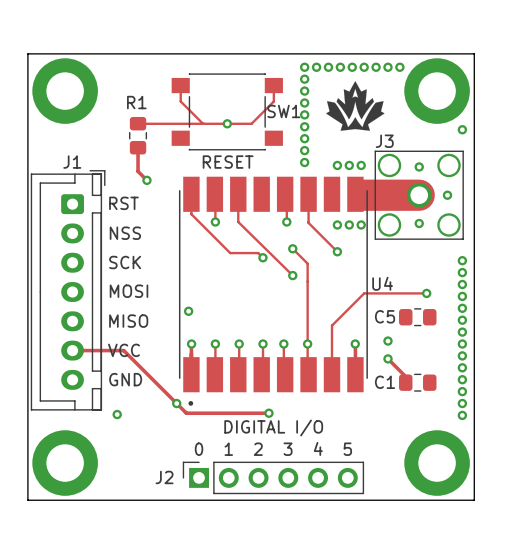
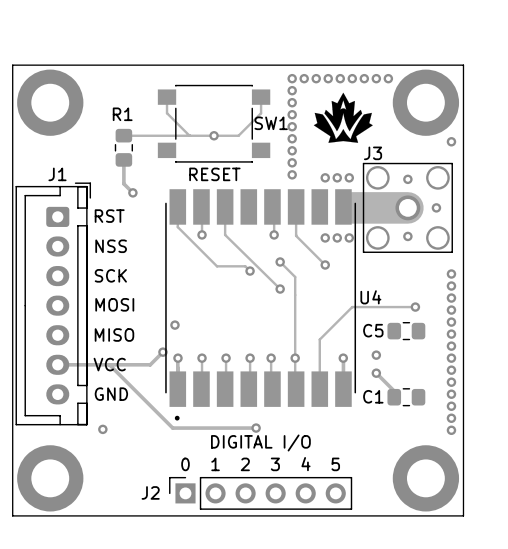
track: none -> (162, 352) (150, 364) (109, 364)
via position: (176, 403) -> (162, 352)

